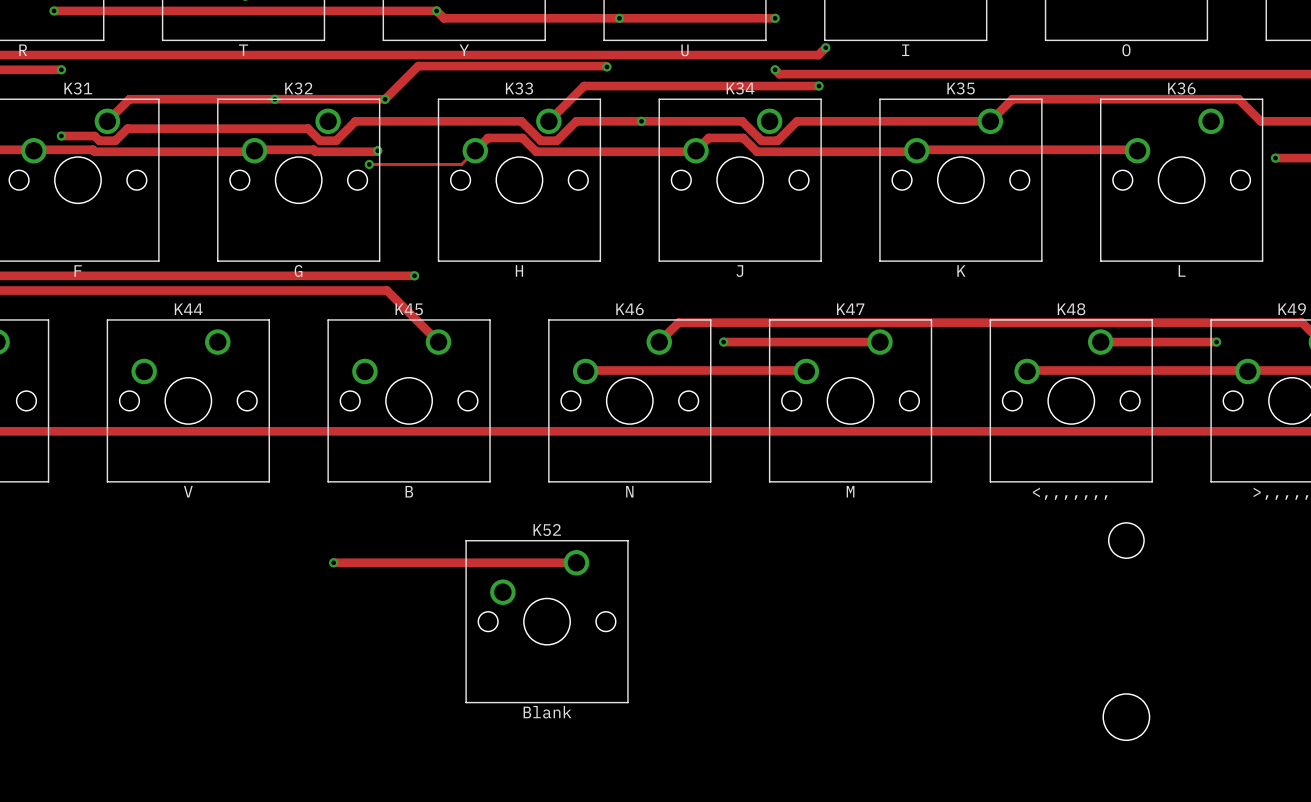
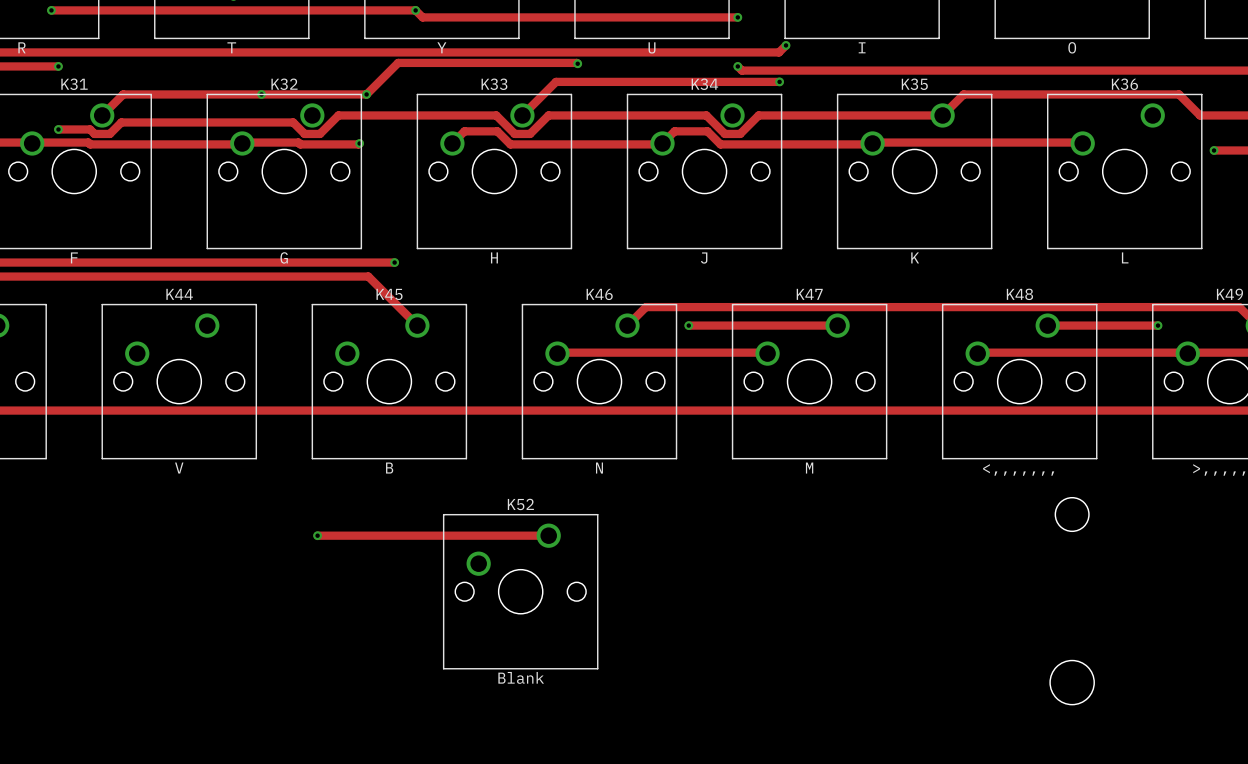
via: (619, 18) -> none
via: (641, 121) -> none
track: (475, 150) (461, 164) (369, 164) -> none
via: (369, 164) -> none

